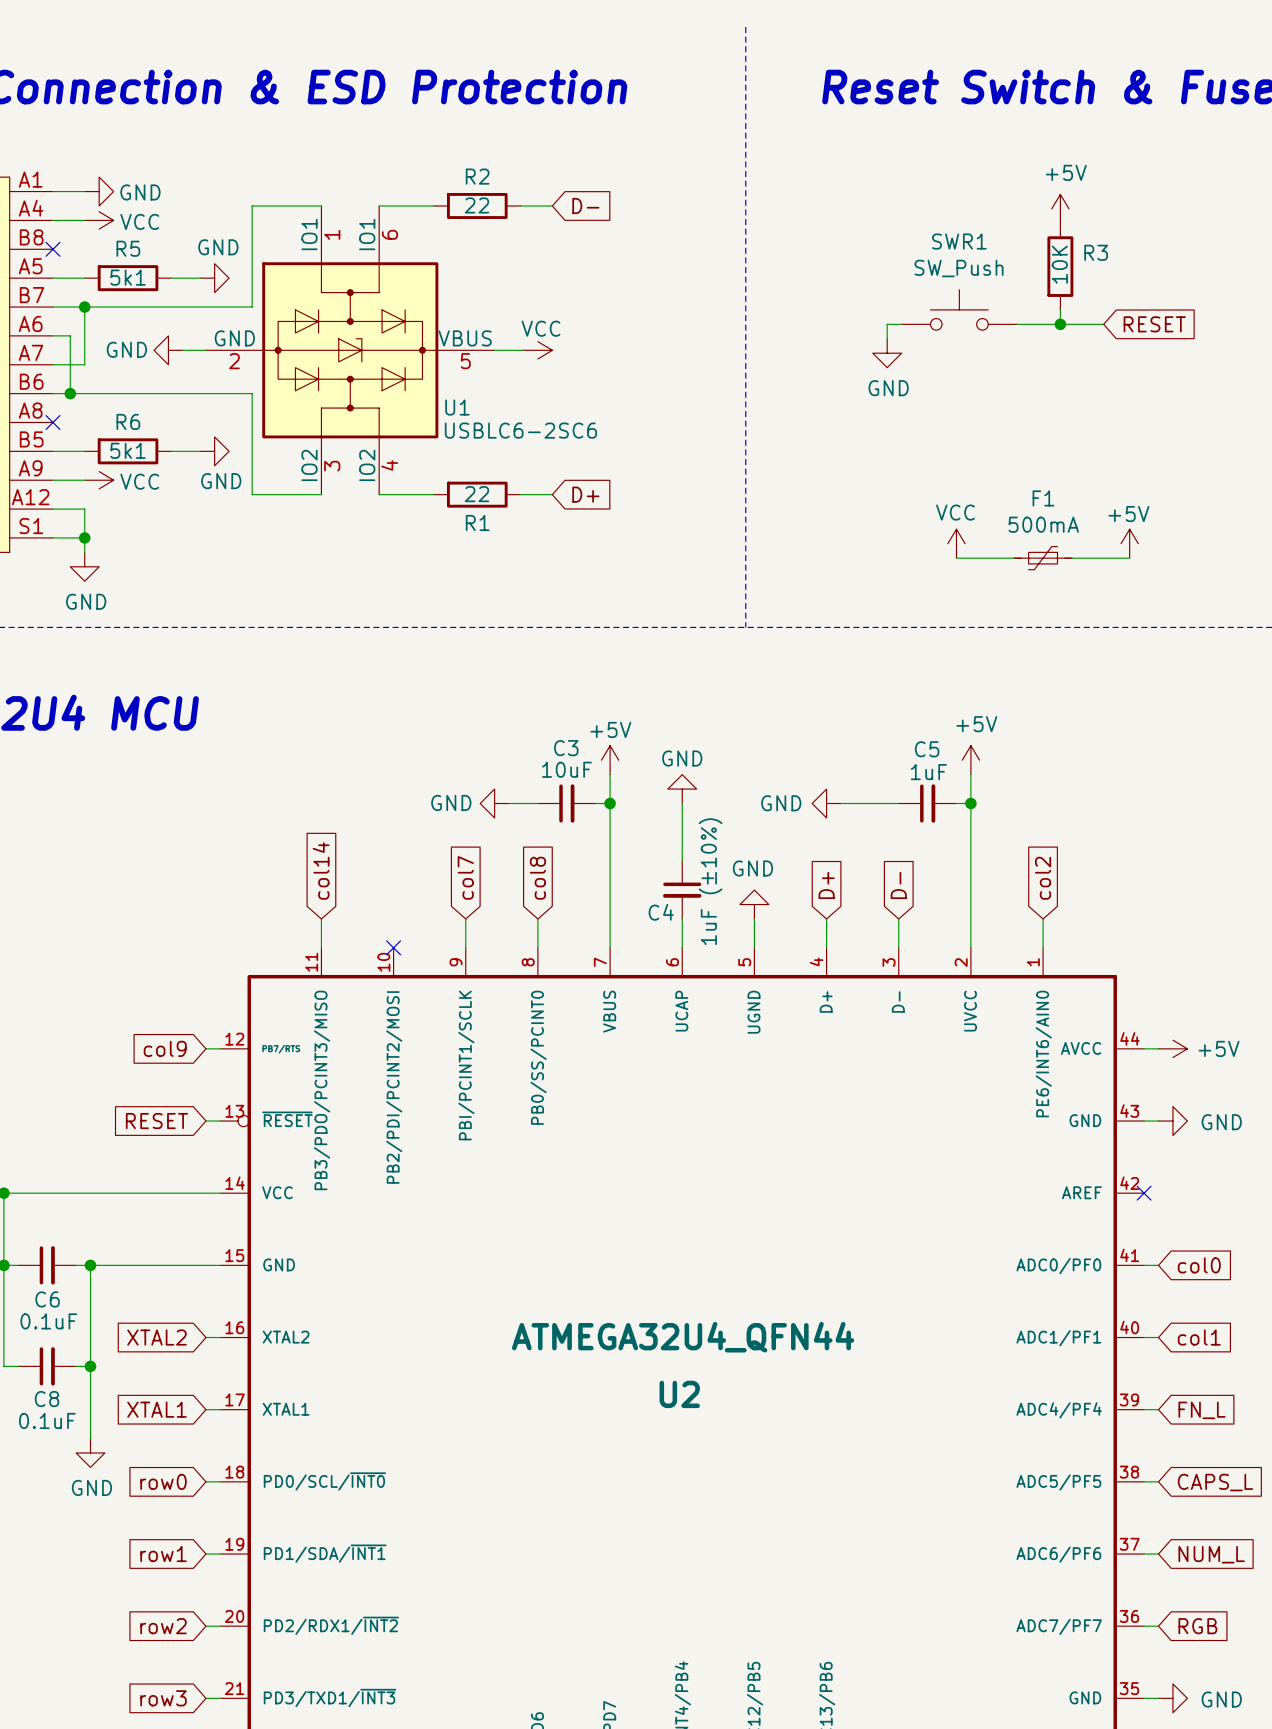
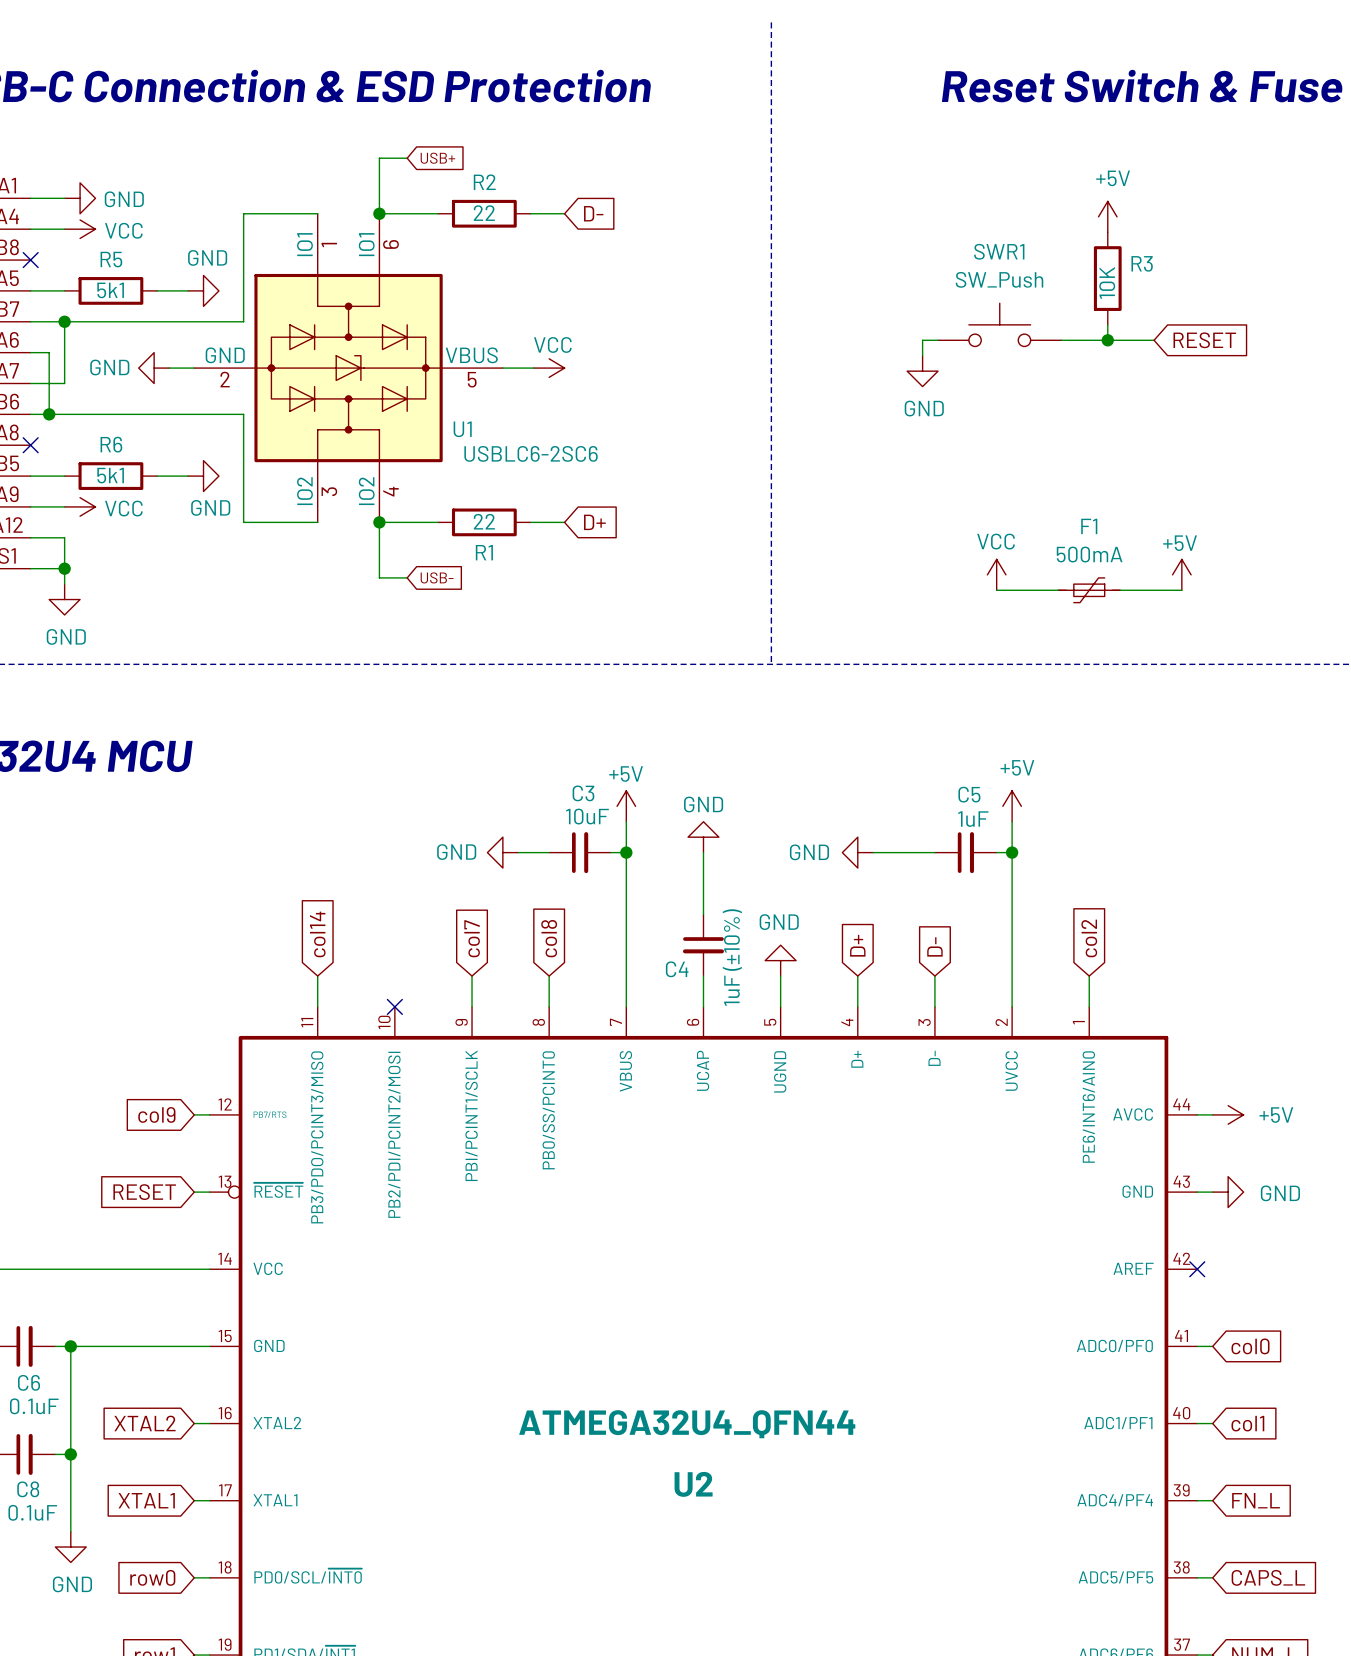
wire: none -> (407, 158) (379, 158) (379, 213)
global label: none -> USB+ (437, 158)
junction: none -> (379, 213)
wire: none -> (379, 522) (379, 577) (407, 577)
junction: none -> (379, 522)
global label: none -> USB- (437, 577)

